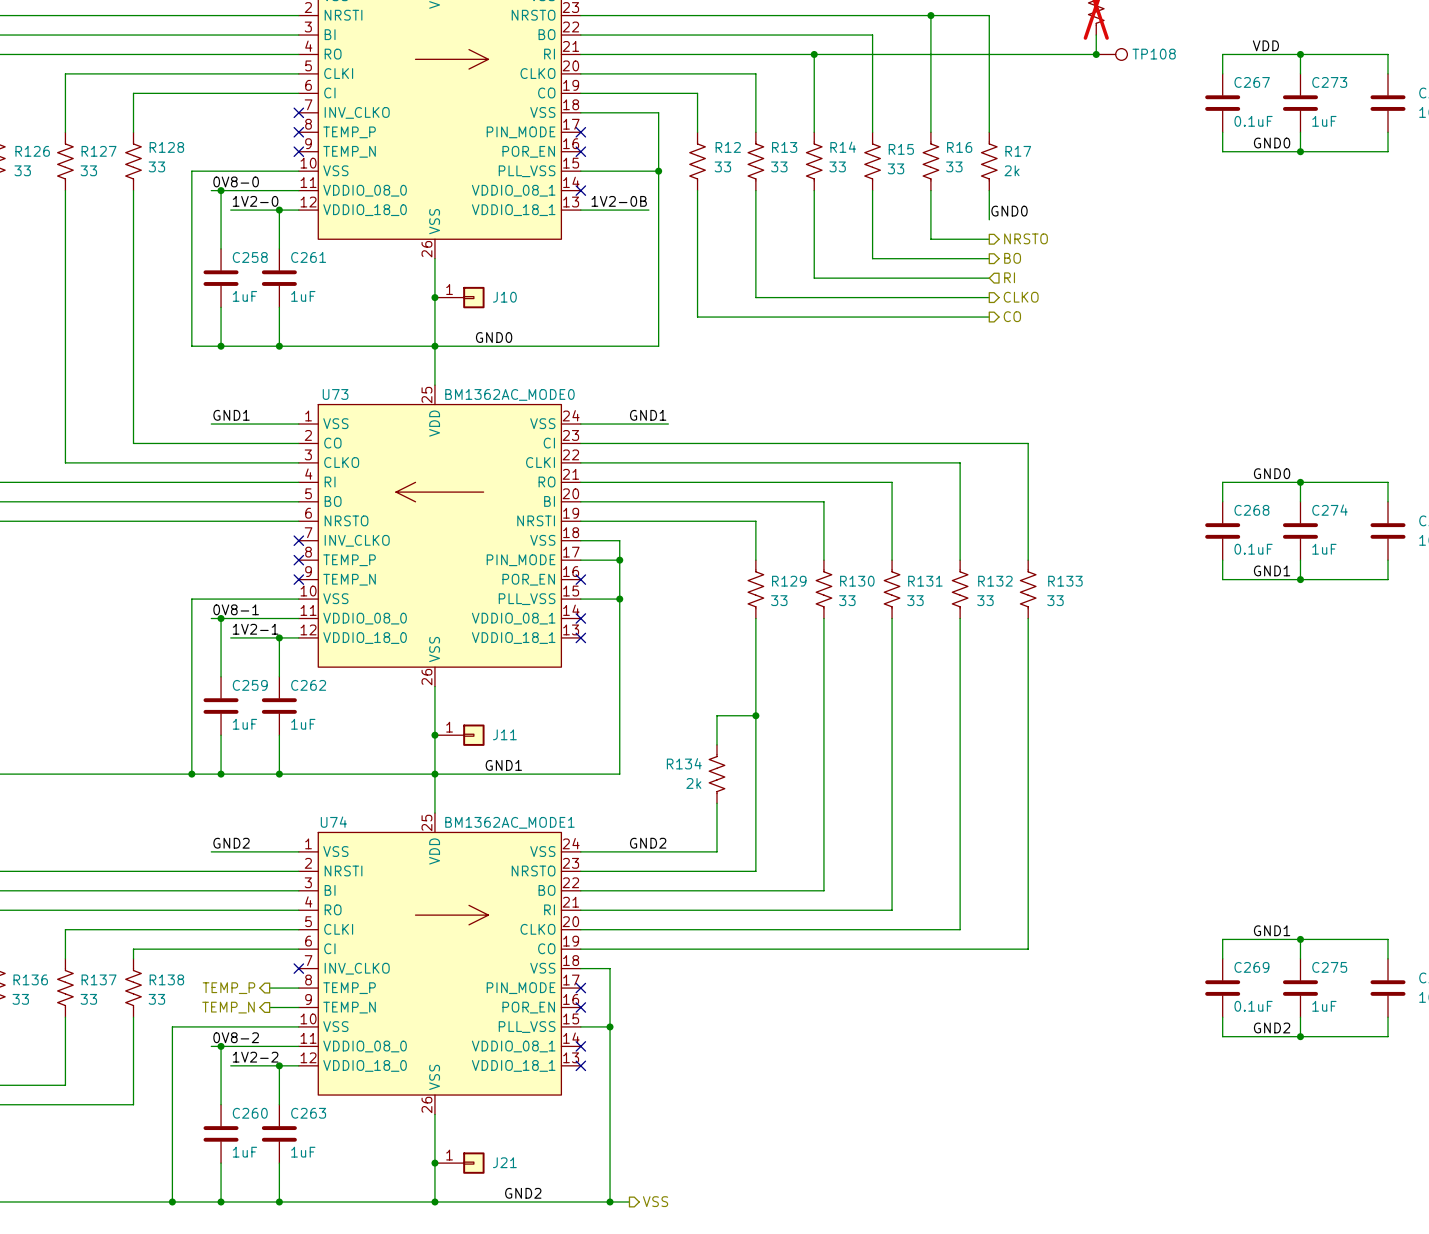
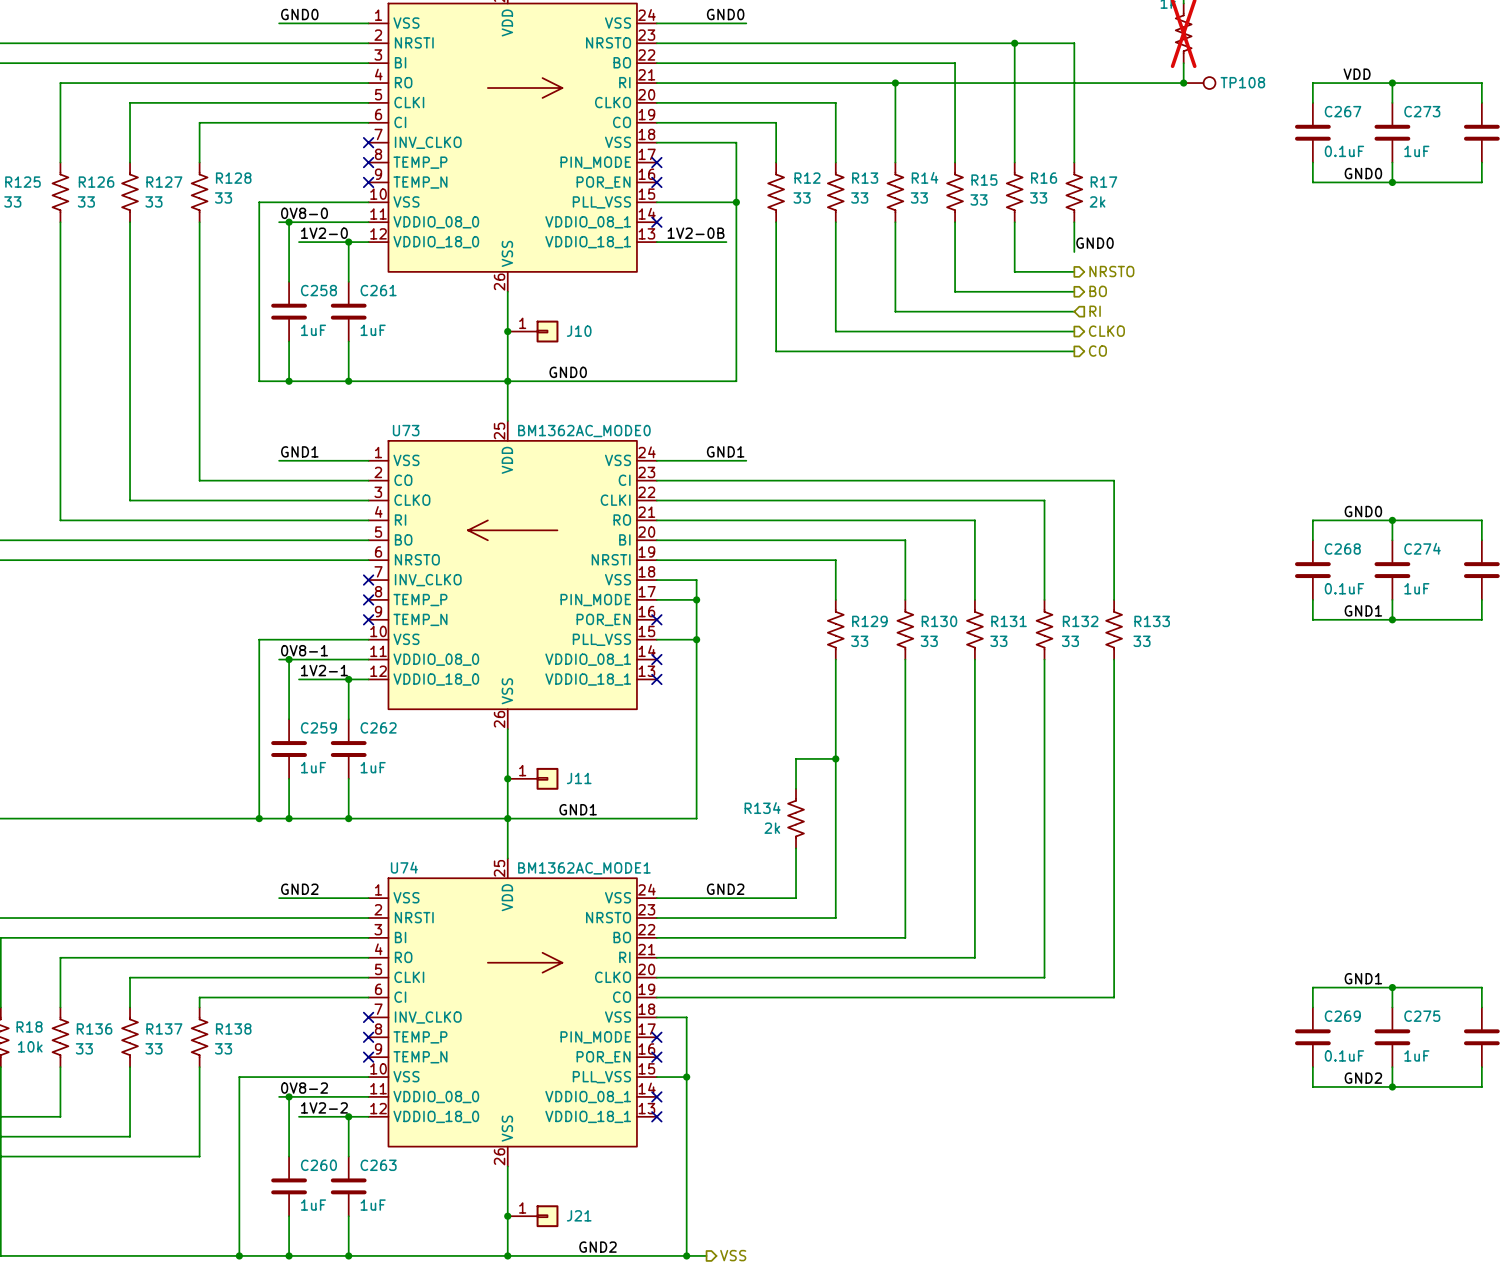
hierarchical label: TEMP_P (228, 988) -> none
wire: (269, 988) (298, 988) -> none
no-connect mark: none -> (368, 1037)
hierarchical label: TEMP_N (228, 1007) -> none
wire: (269, 1007) (298, 1007) -> none
no-connect mark: none -> (368, 1057)

